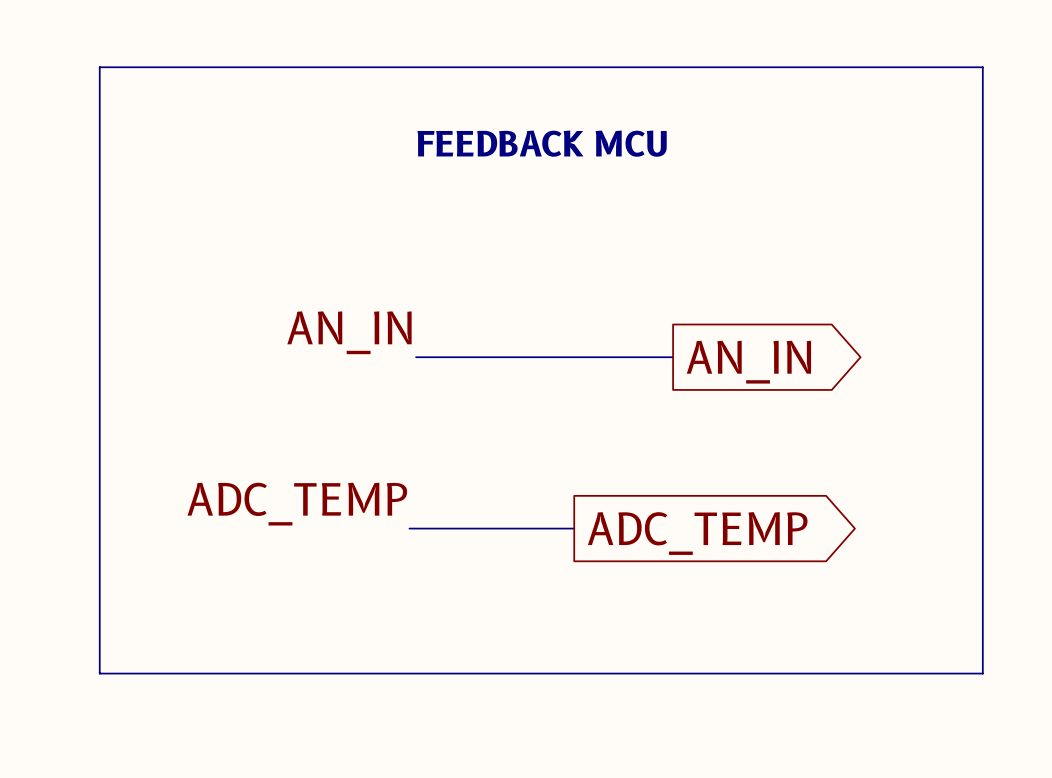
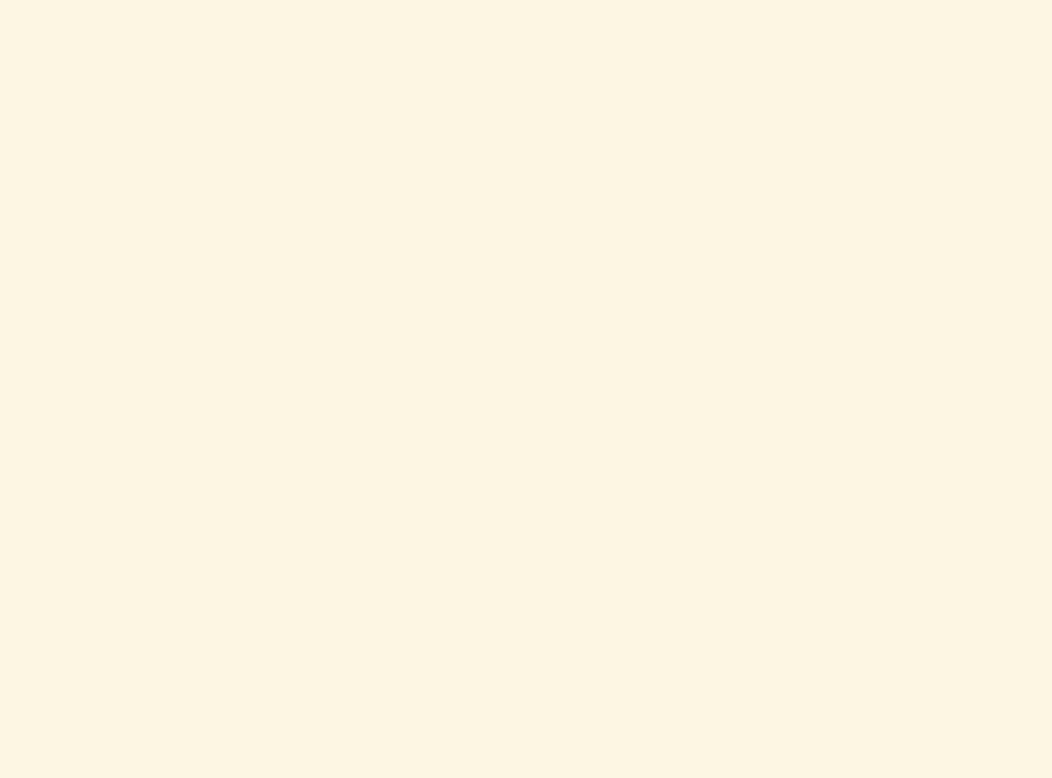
line: (99, 67) (982, 67) (982, 673) (99, 673) (99, 67) -> none
text: FEEDBACK MCU (542, 143) -> none
label: AN_IN (349, 332) -> none
wire: (416, 357) (673, 357) -> none
global label: AN_IN (748, 362) -> none
label: ADC_TEMP (297, 504) -> none
wire: (409, 528) (574, 528) -> none
global label: ADC_TEMP (697, 533) -> none

